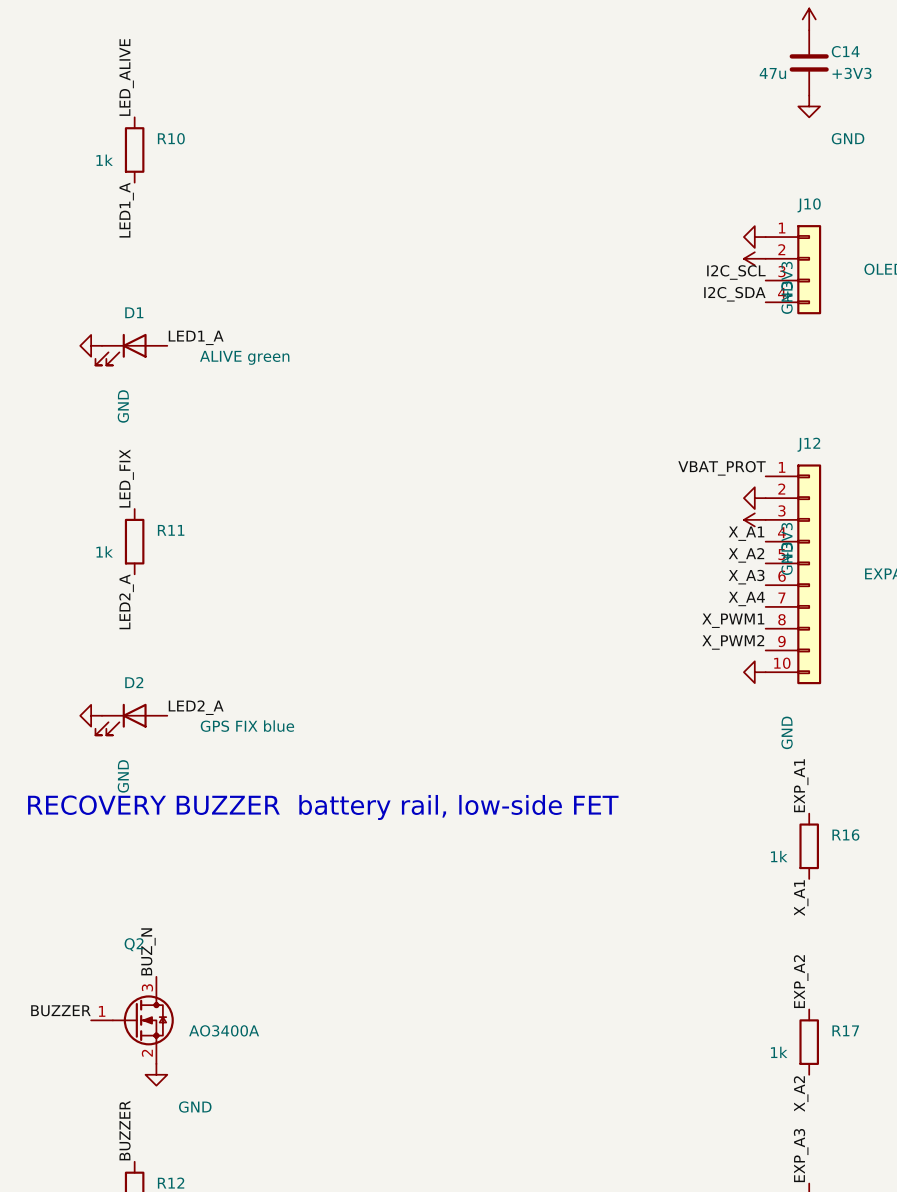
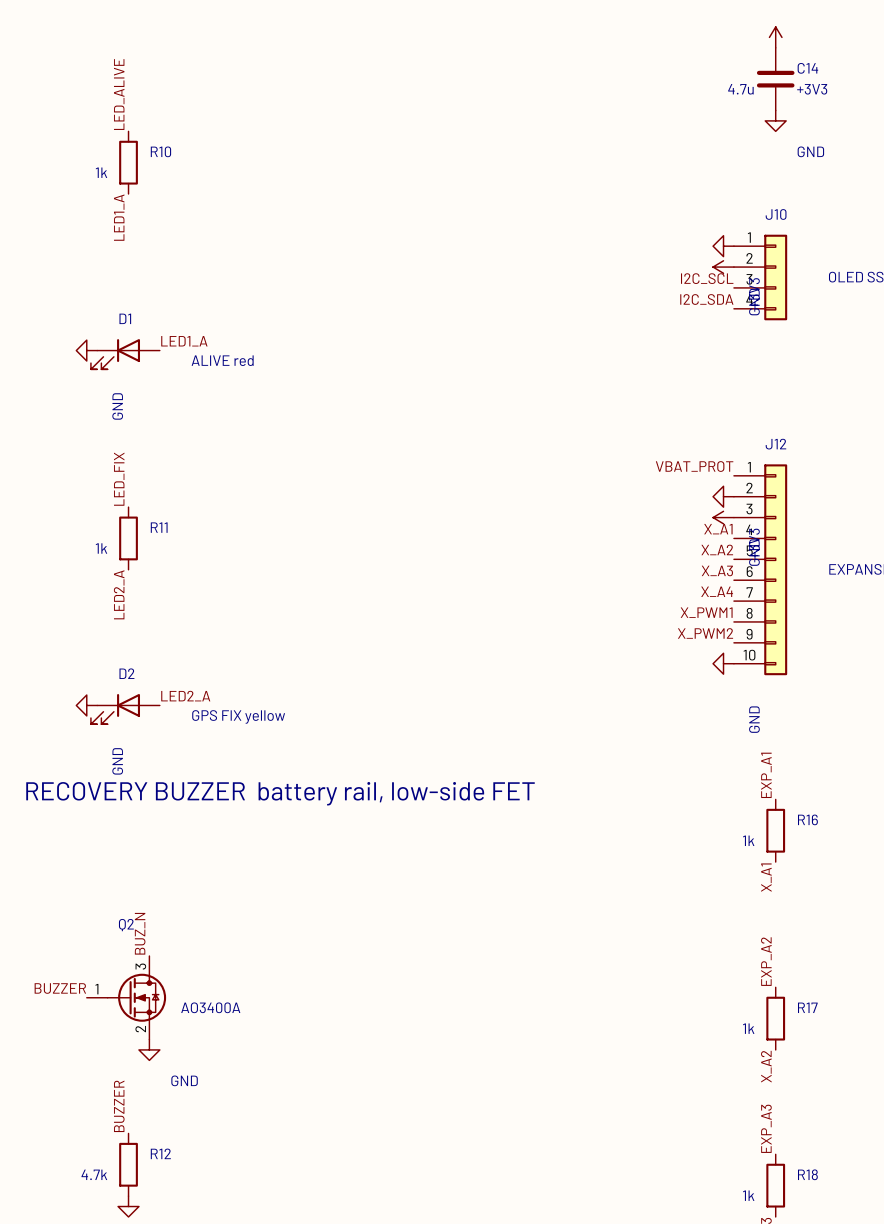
C14 value: 47u (772, 73) -> 4.7u (740, 89)
D1 value: ALIVE green (244, 357) -> ALIVE red (222, 360)
D2 value: GPS FIX blue (247, 726) -> GPS FIX yellow (238, 716)

